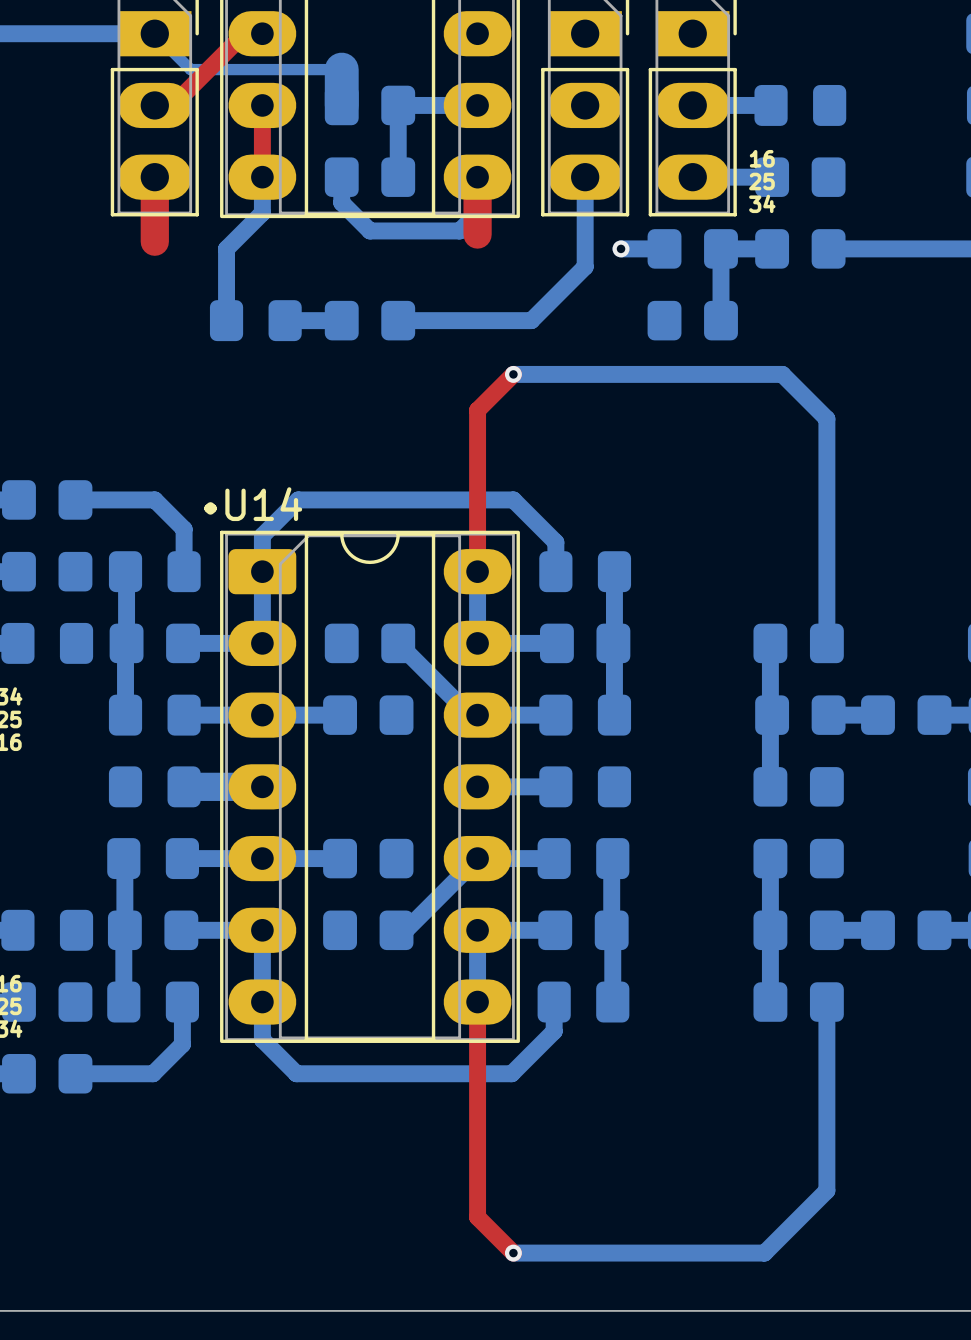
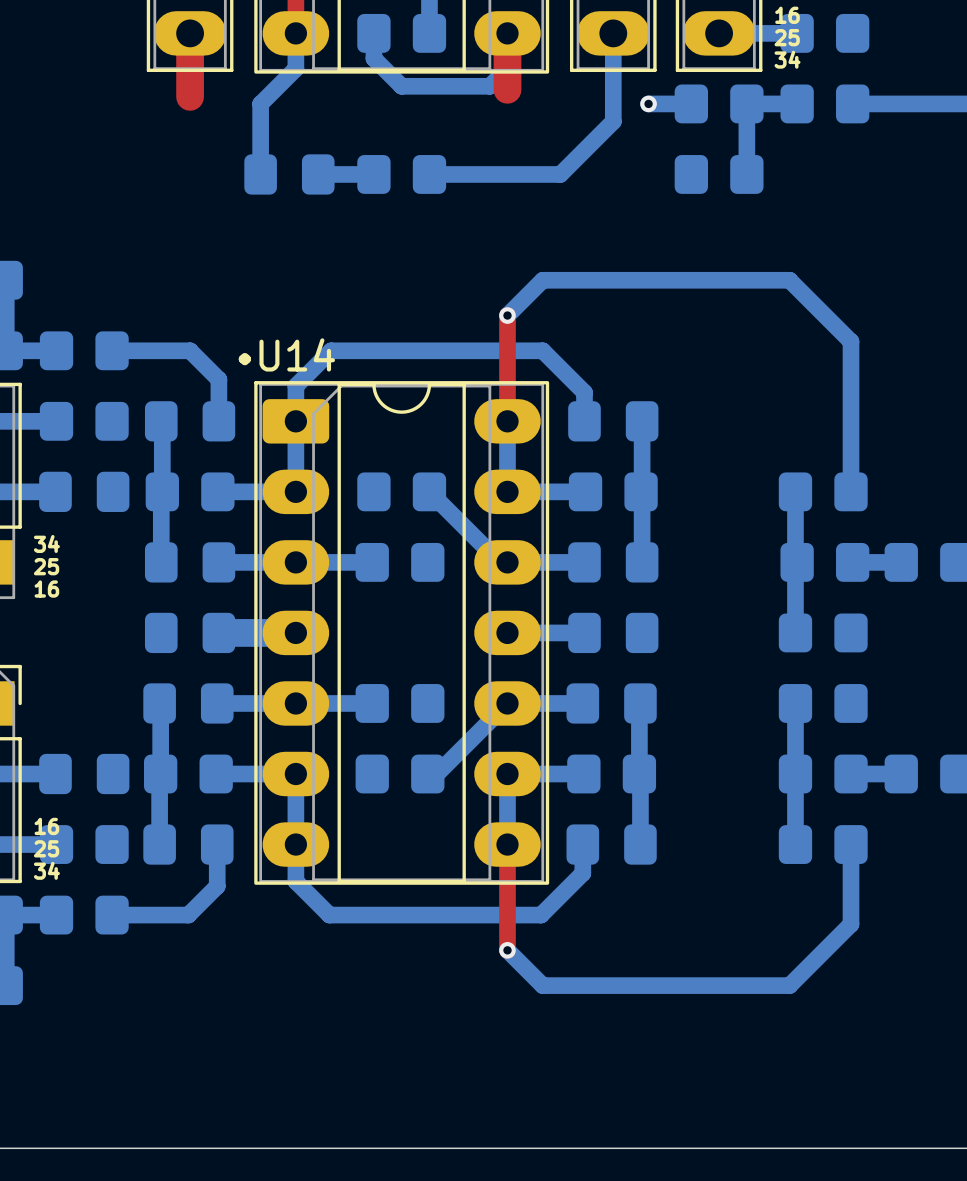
bottom track: (513, 374) (782, 374) (826, 418) (826, 490) -> (507, 315) (542, 280) (789, 280) (851, 341)
top track: (513, 374) (477, 410) (477, 464) -> none
via position: (513, 374) -> (507, 315)
bottom track: (826, 1083) (826, 1190) (764, 1253) (513, 1253) -> (851, 924) (789, 985) (542, 985) (507, 950)
top track: (477, 1109) (477, 1217) (513, 1253) -> none
via position: (513, 1253) -> (507, 950)

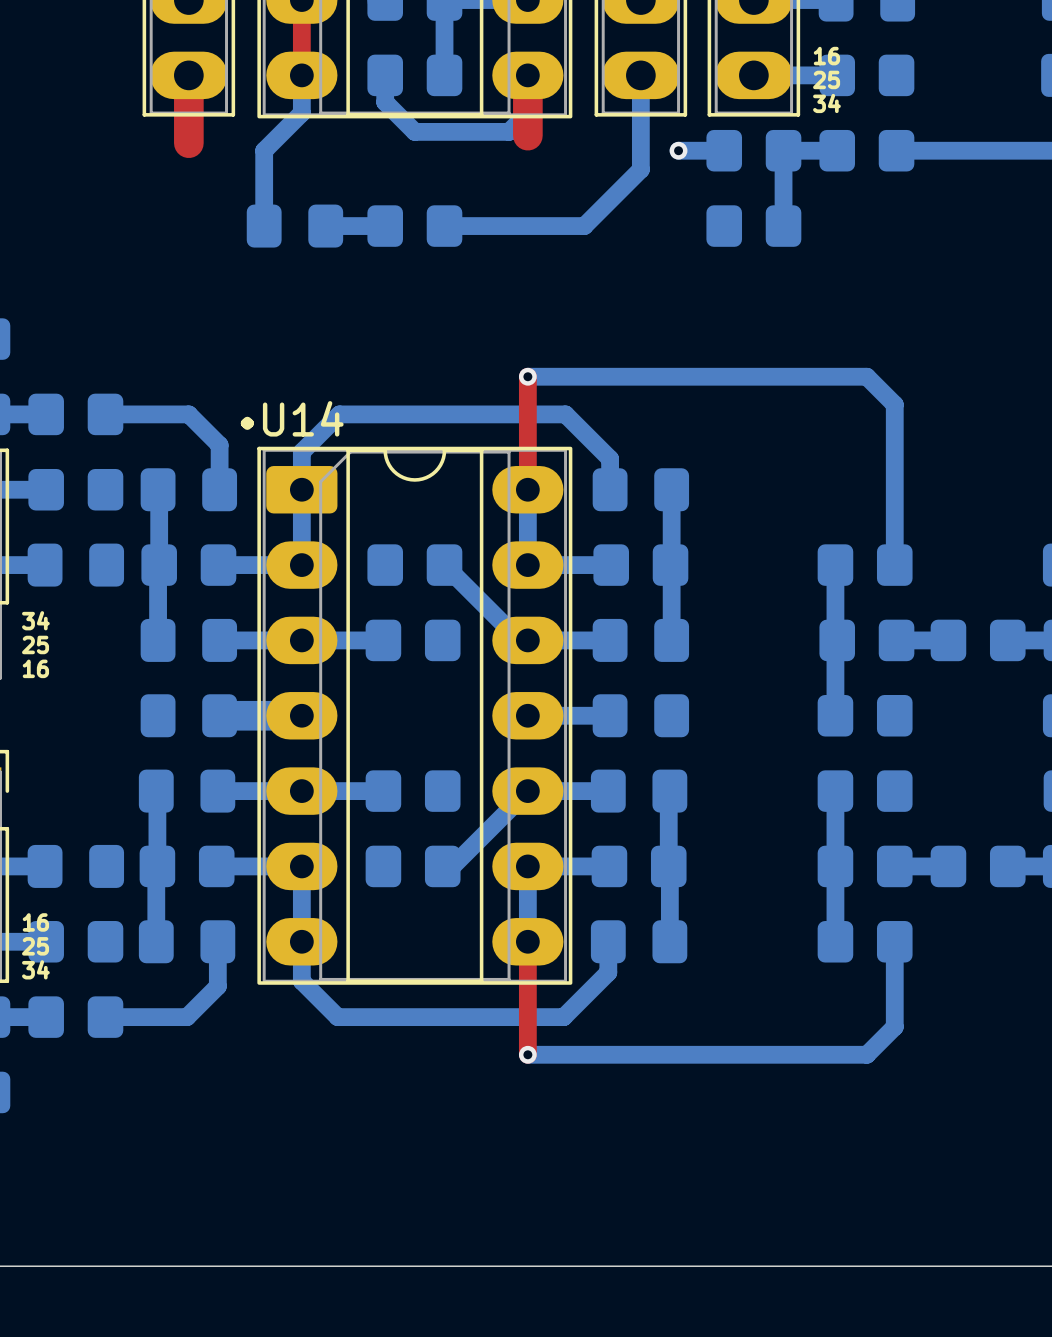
bottom track: (507, 315) (542, 280) (789, 280) (824, 315) -> (527, 376) (866, 376)
bottom track: (507, 950) (542, 985) (789, 985) (824, 950) -> (527, 1054) (866, 1054)

